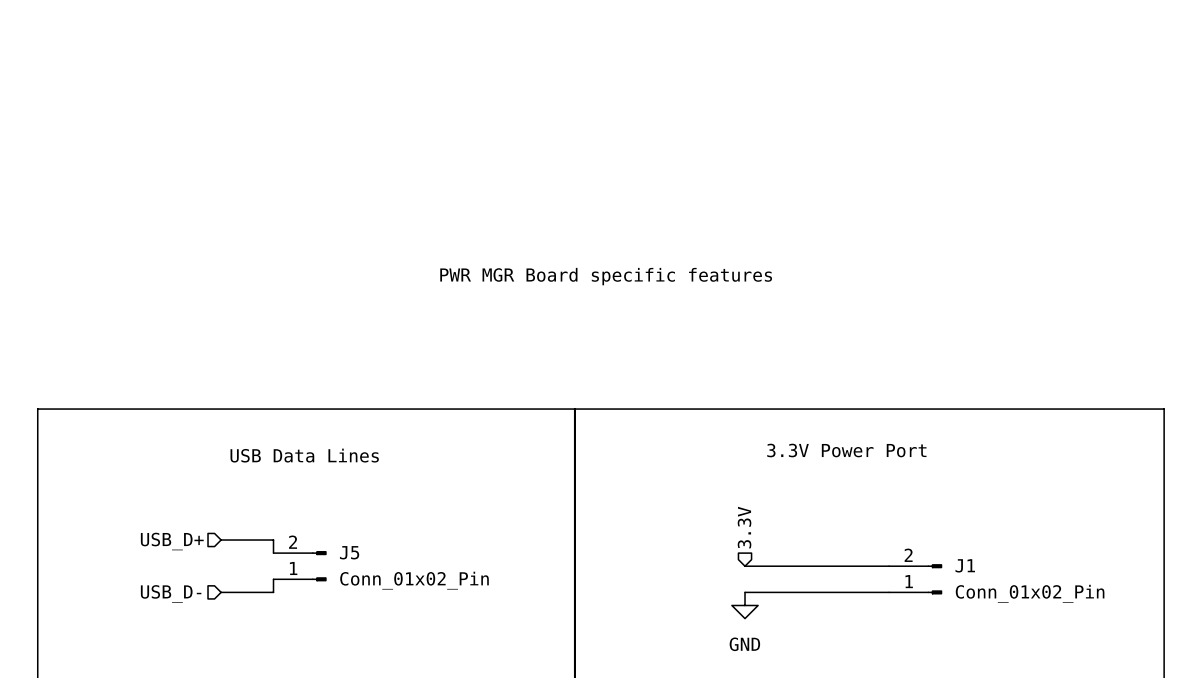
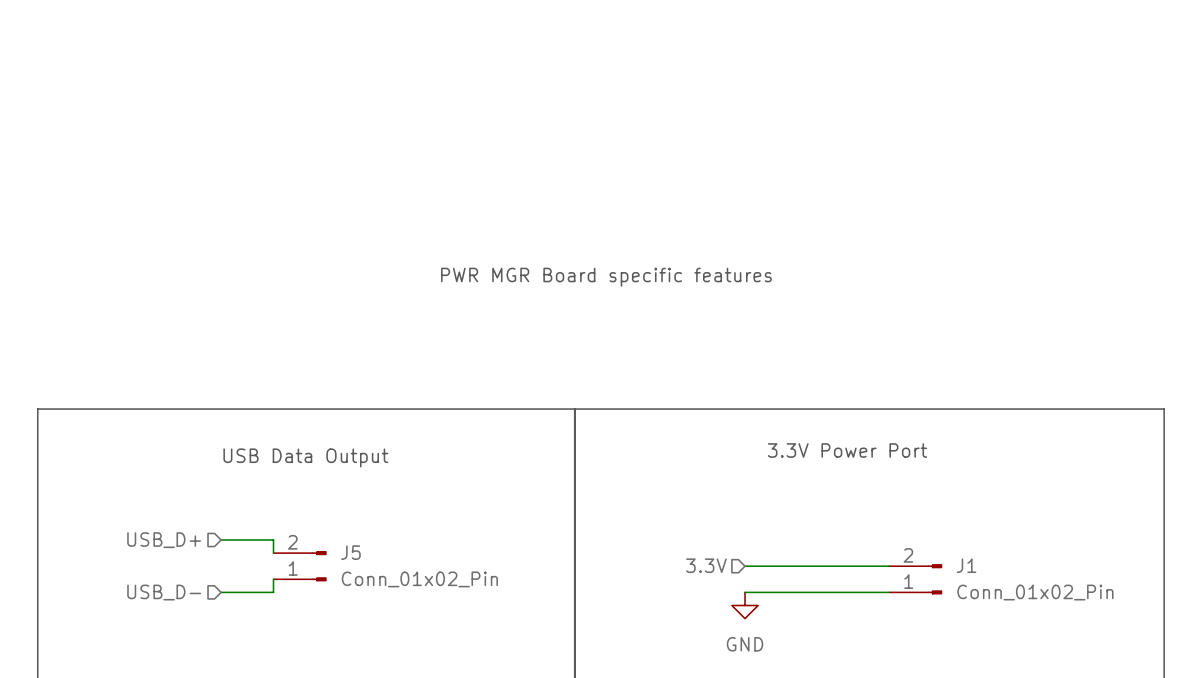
text: USB Data Lines (304, 455) -> USB Data Output (305, 457)
hierarchical label rotation: 0° (744, 527) -> 90° counterclockwise (706, 565)
hierarchical label position: 3.3V (744, 527) -> 3.3V (706, 565)

